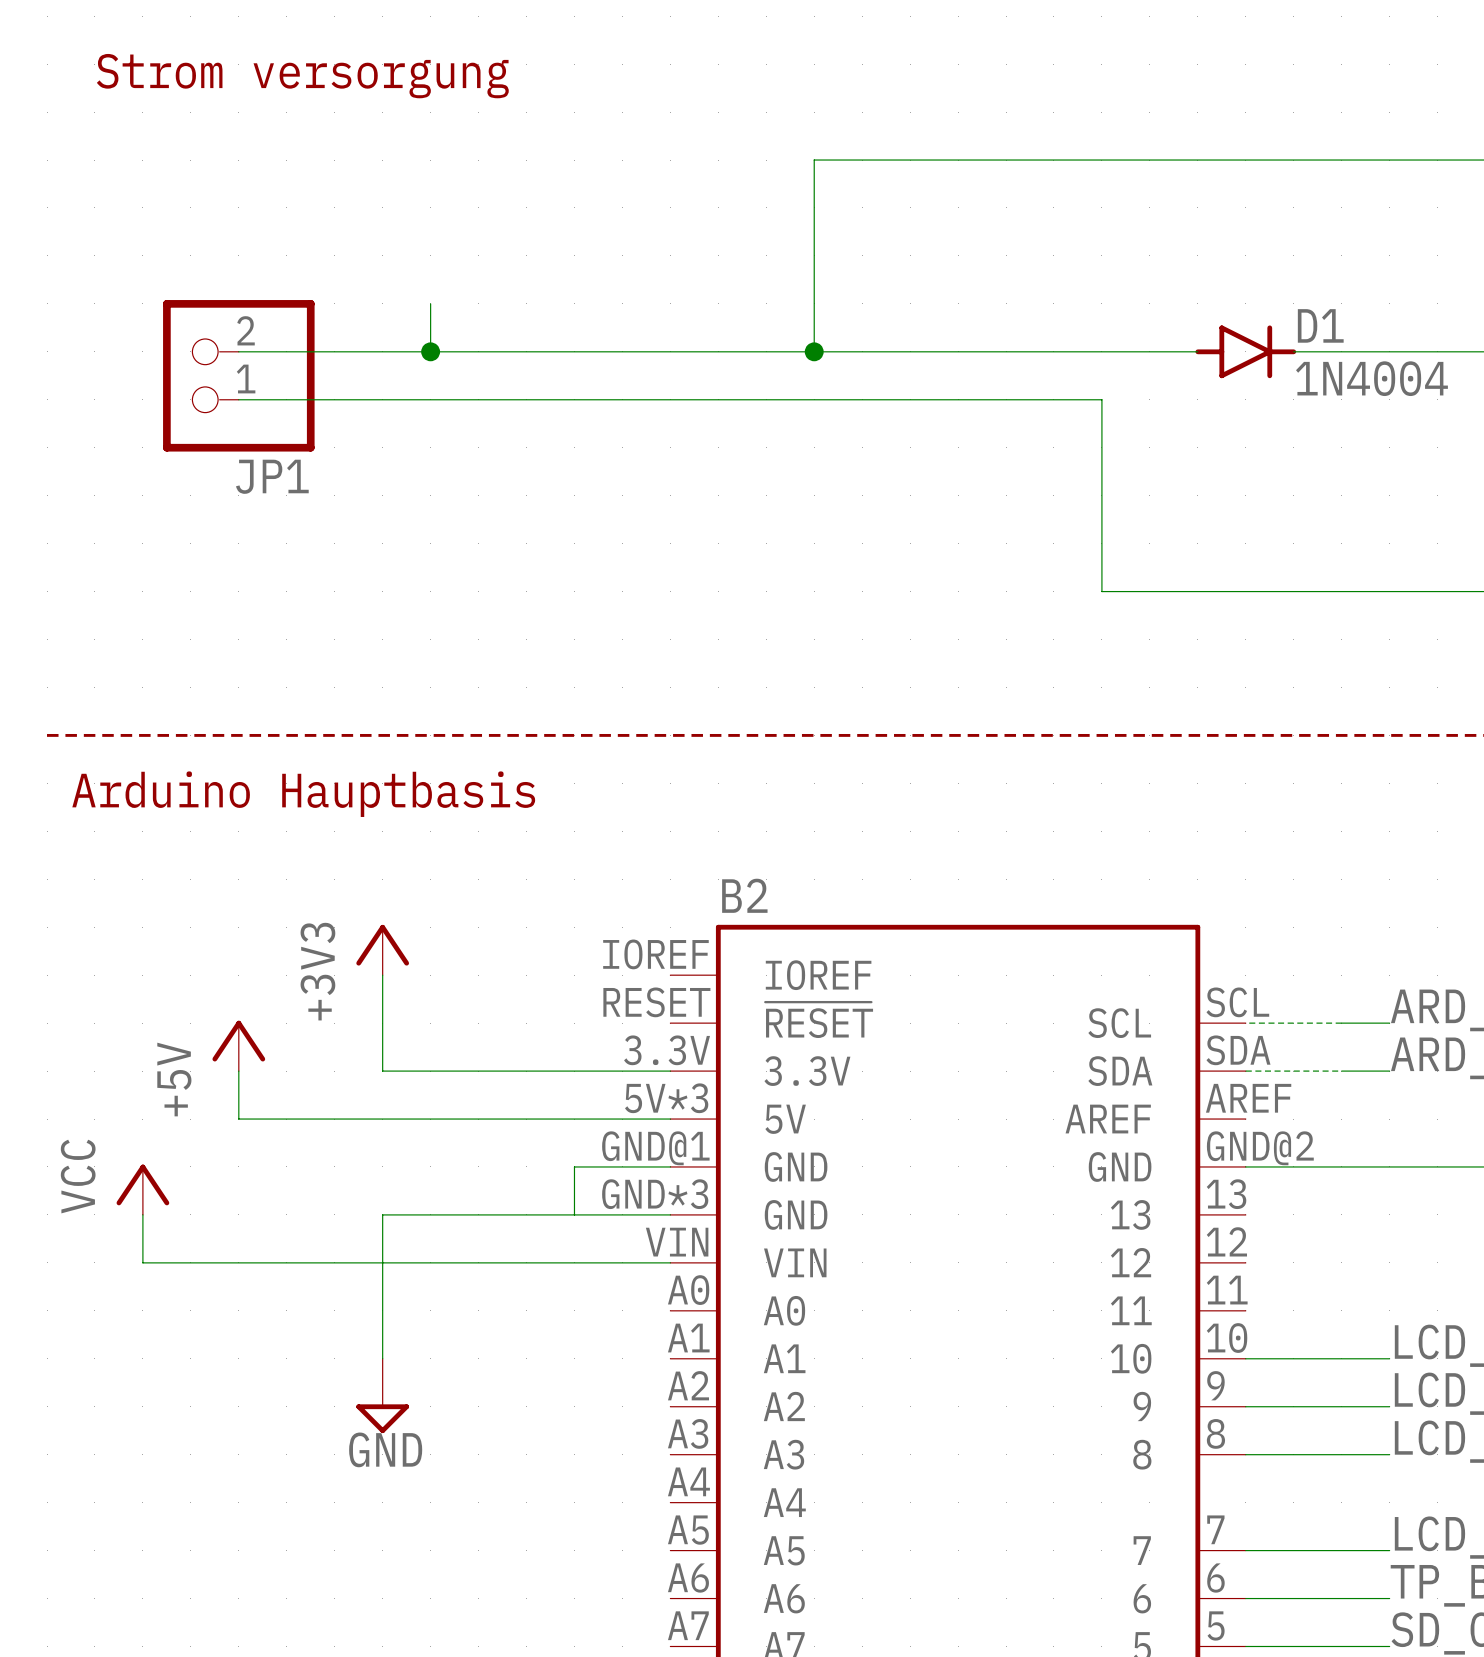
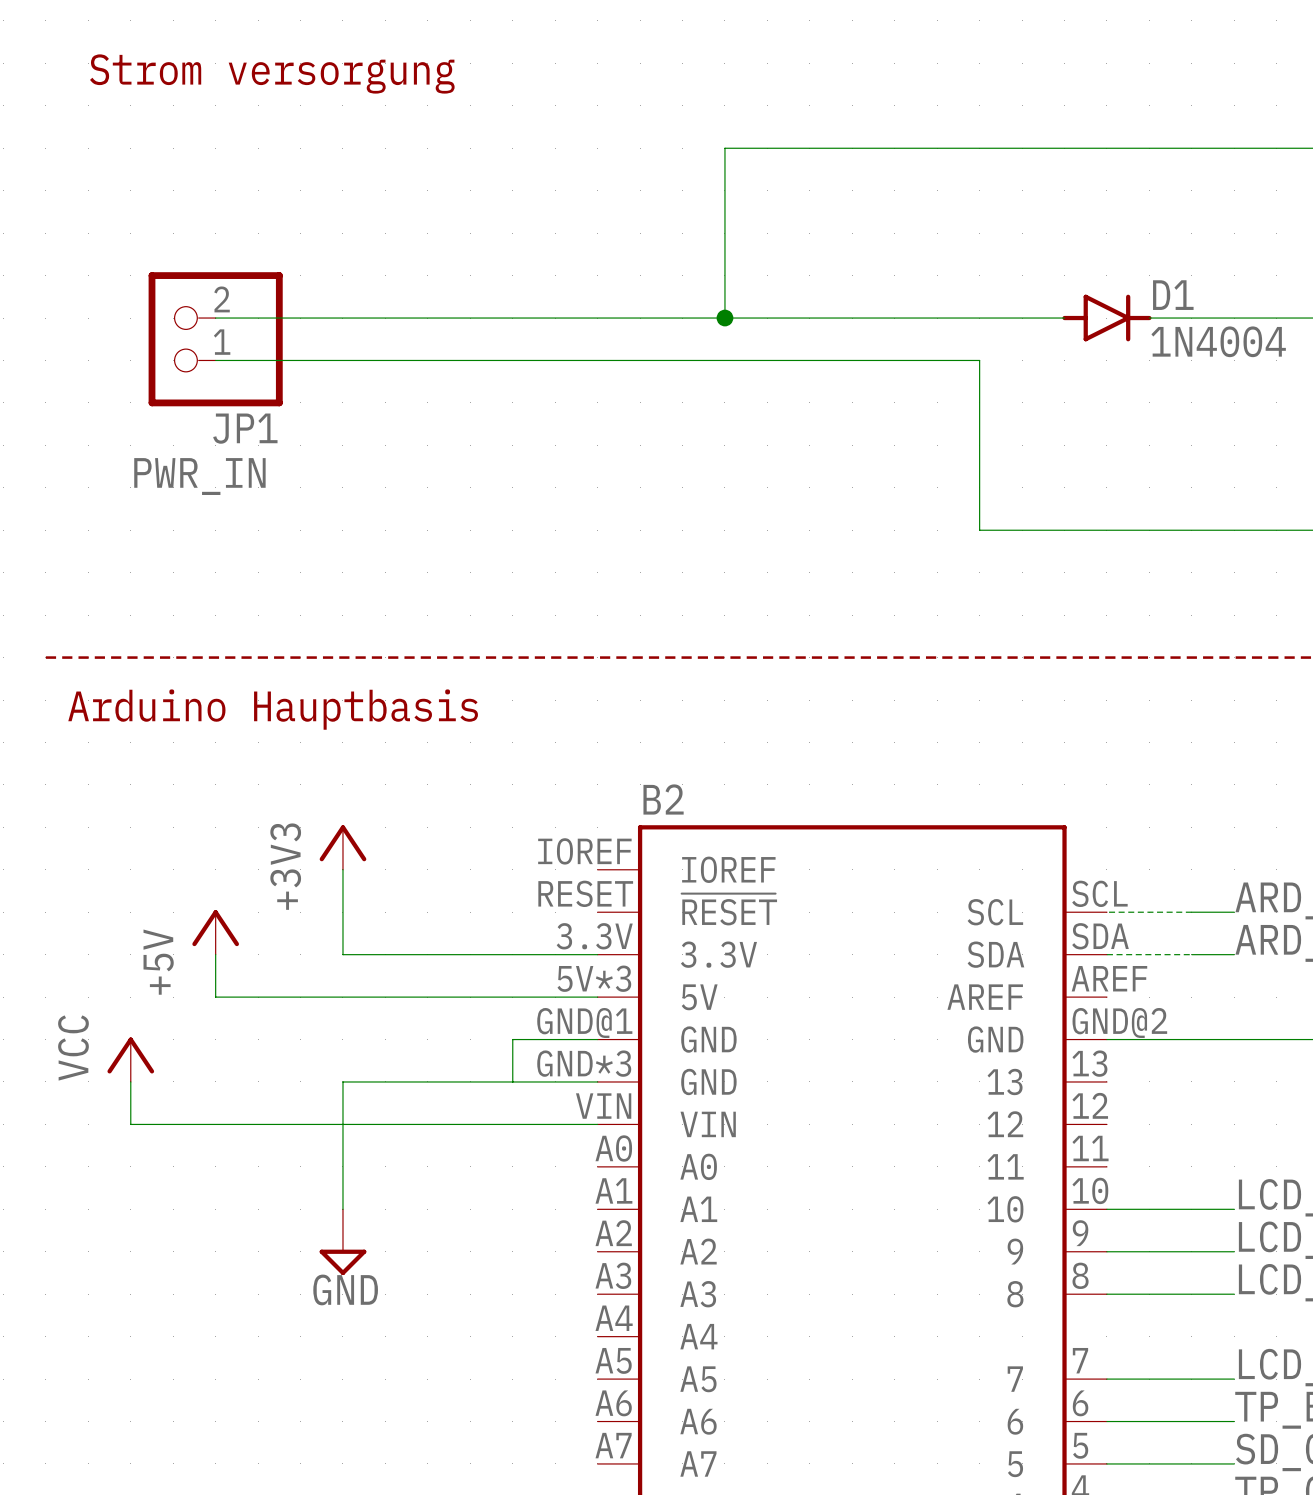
wire: (430, 303) (430, 351) -> none
junction: (430, 351) -> none
text: none -> PWR_IN (199, 476)

